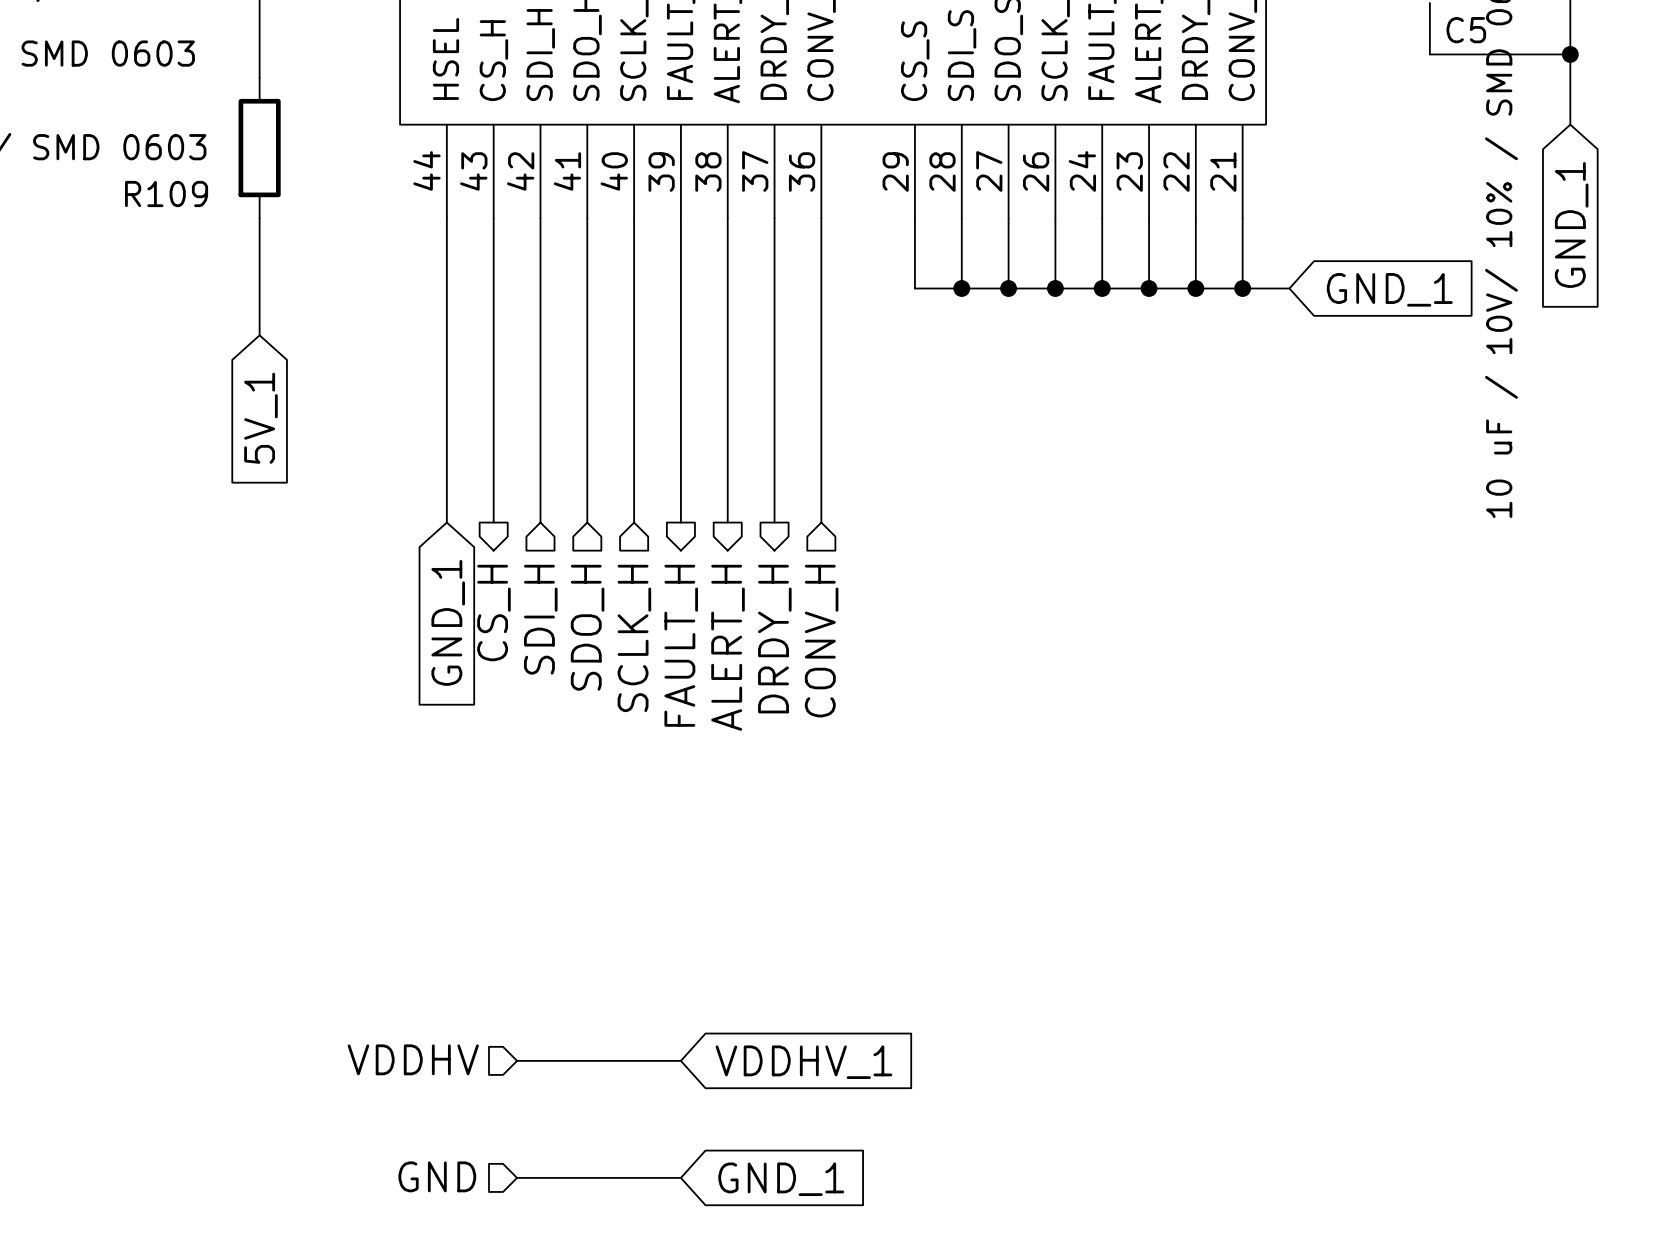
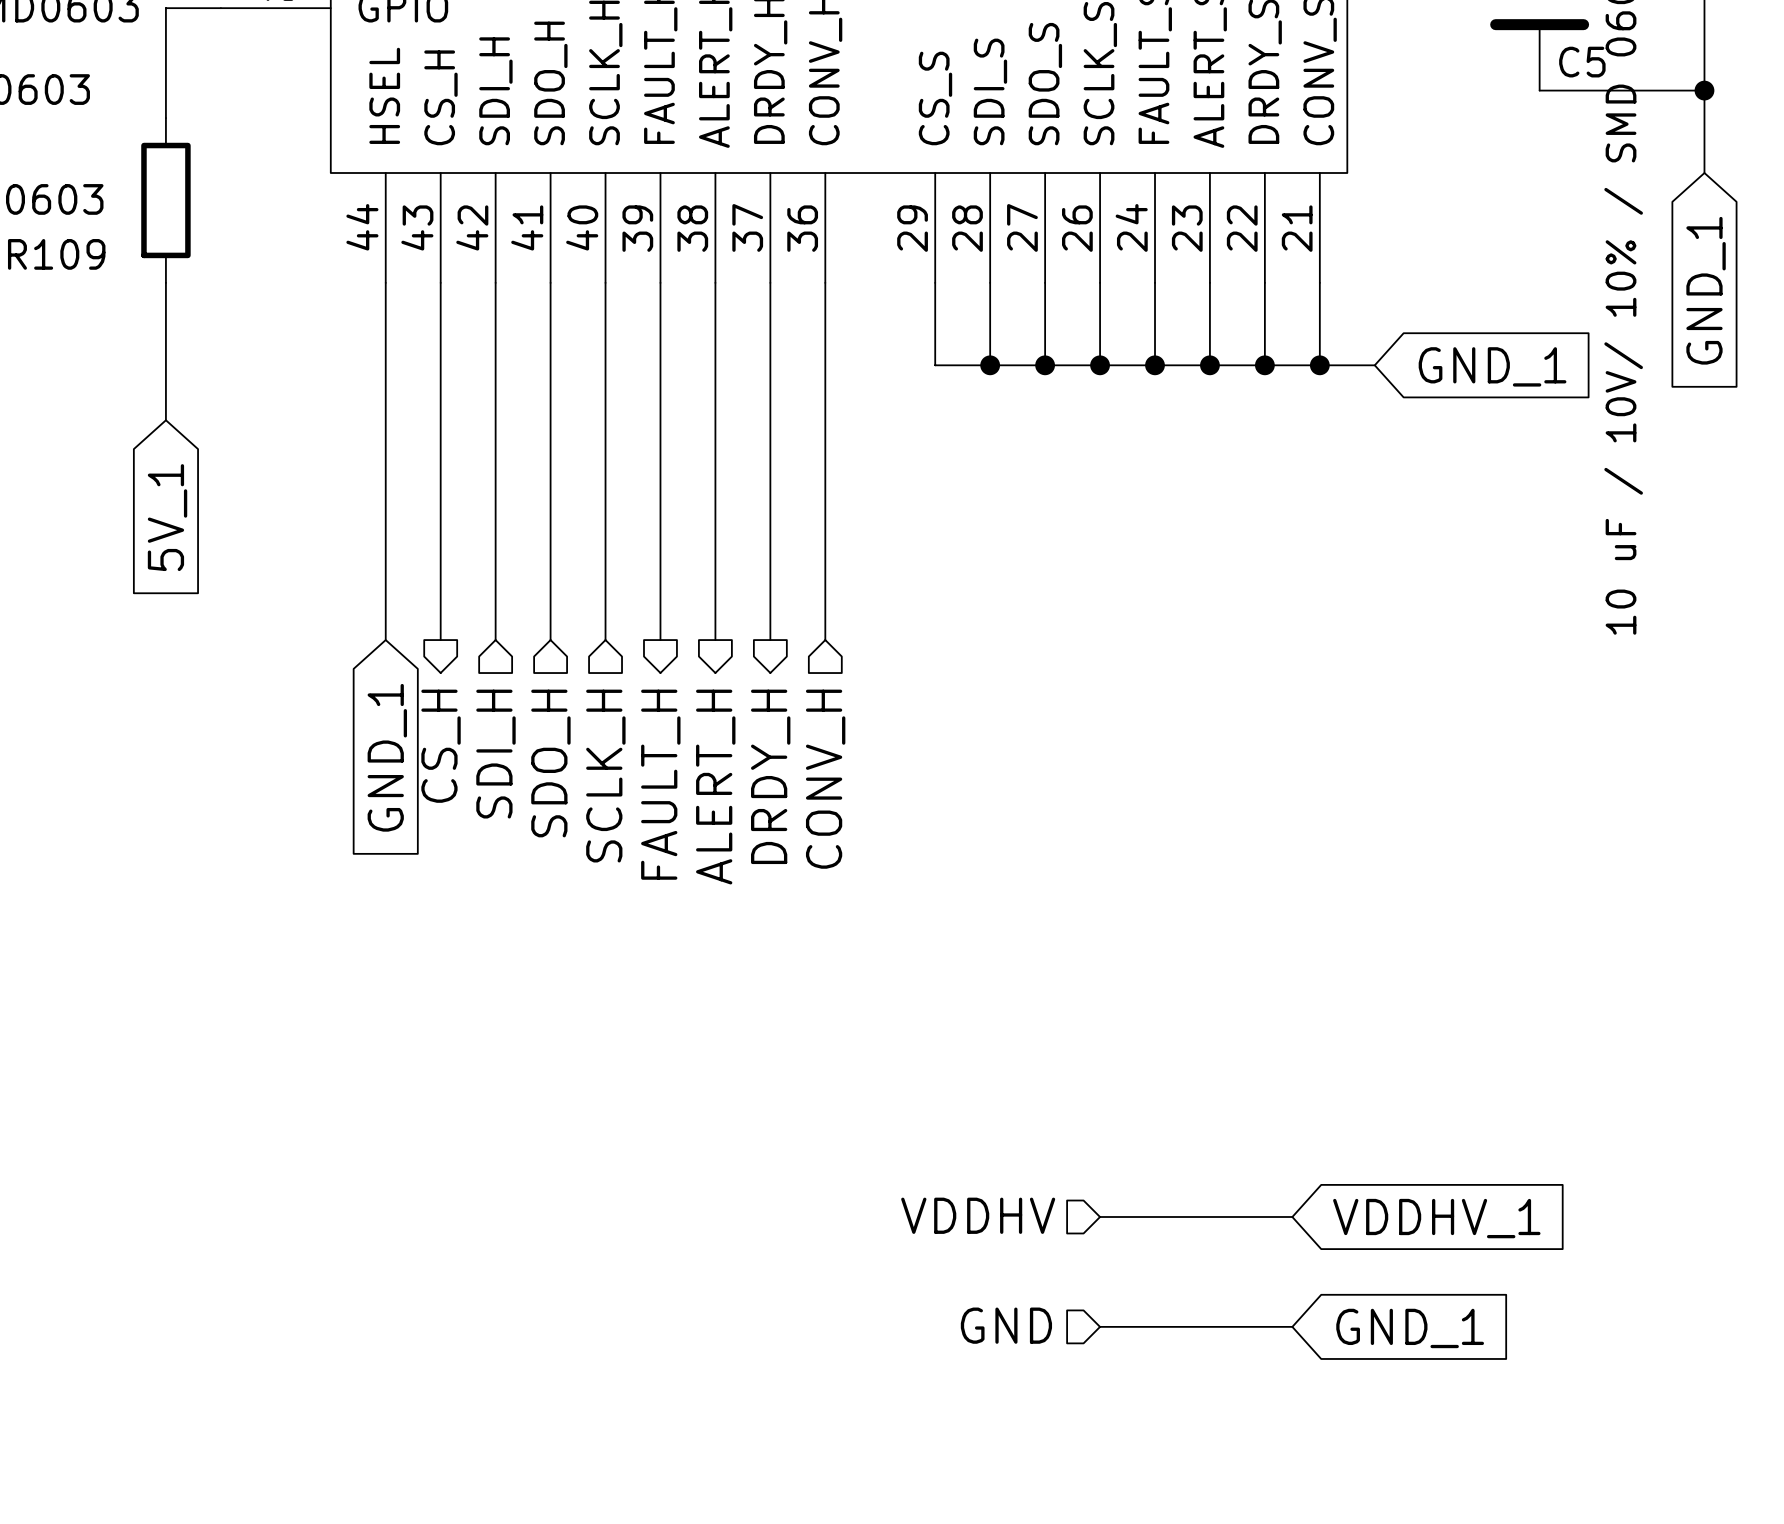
hierarchical label: none -> VDDHV (978, 1215)
wire: none -> (1100, 1217) (1292, 1217)
global label: none -> VDDHV_1 (1436, 1218)
hierarchical label: VDDHV (413, 1059) -> none
wire: (517, 1060) (680, 1060) -> none
global label: VDDHV_1 (803, 1062) -> none
hierarchical label: none -> GND (1006, 1325)
wire: none -> (1100, 1326) (1292, 1326)
global label: none -> GND_1 (1410, 1328)
hierarchical label: GND (437, 1176) -> none
wire: (517, 1177) (680, 1177) -> none
global label: GND_1 (781, 1179) -> none

